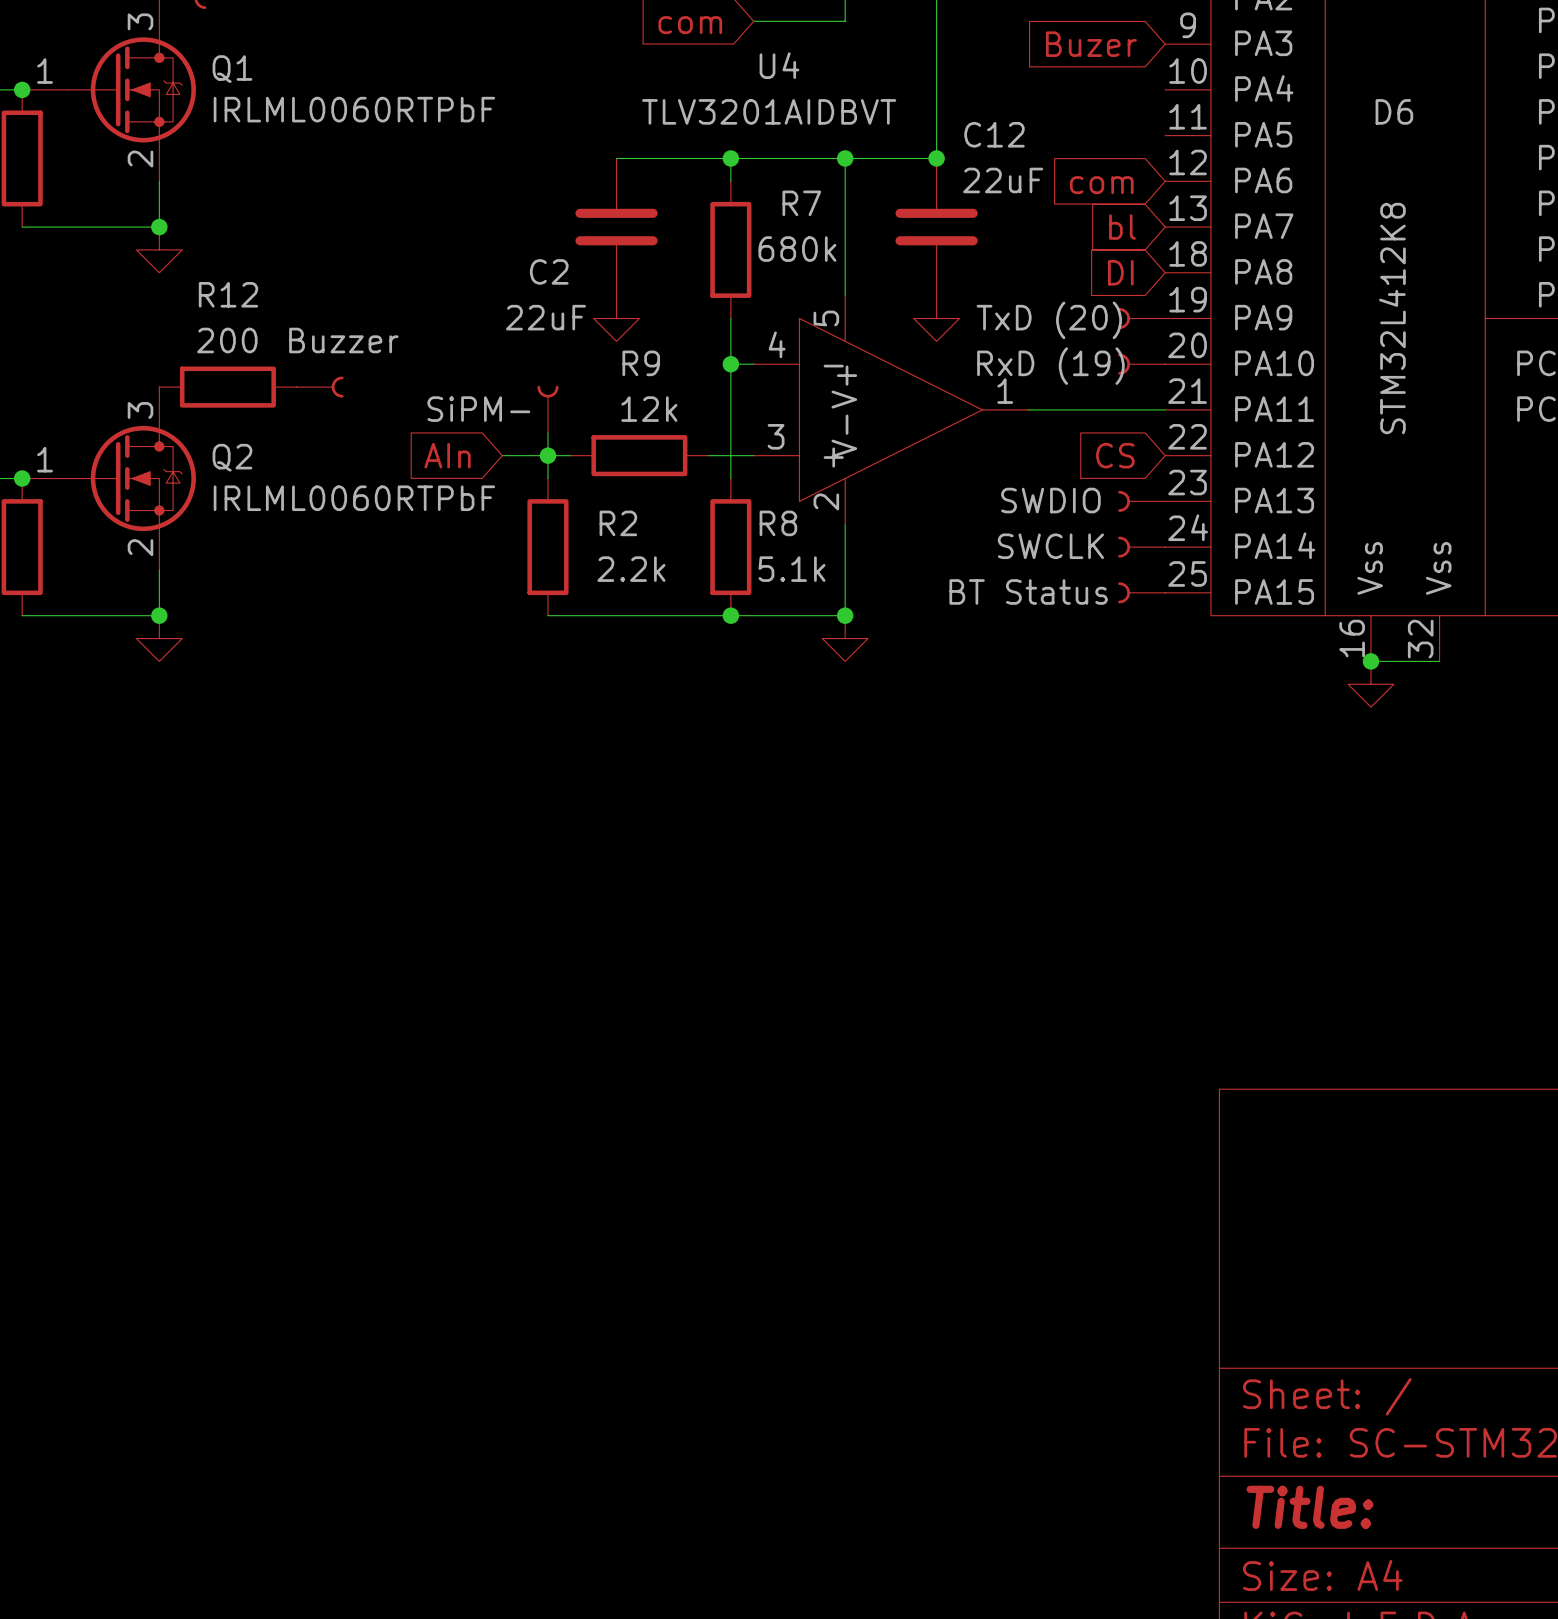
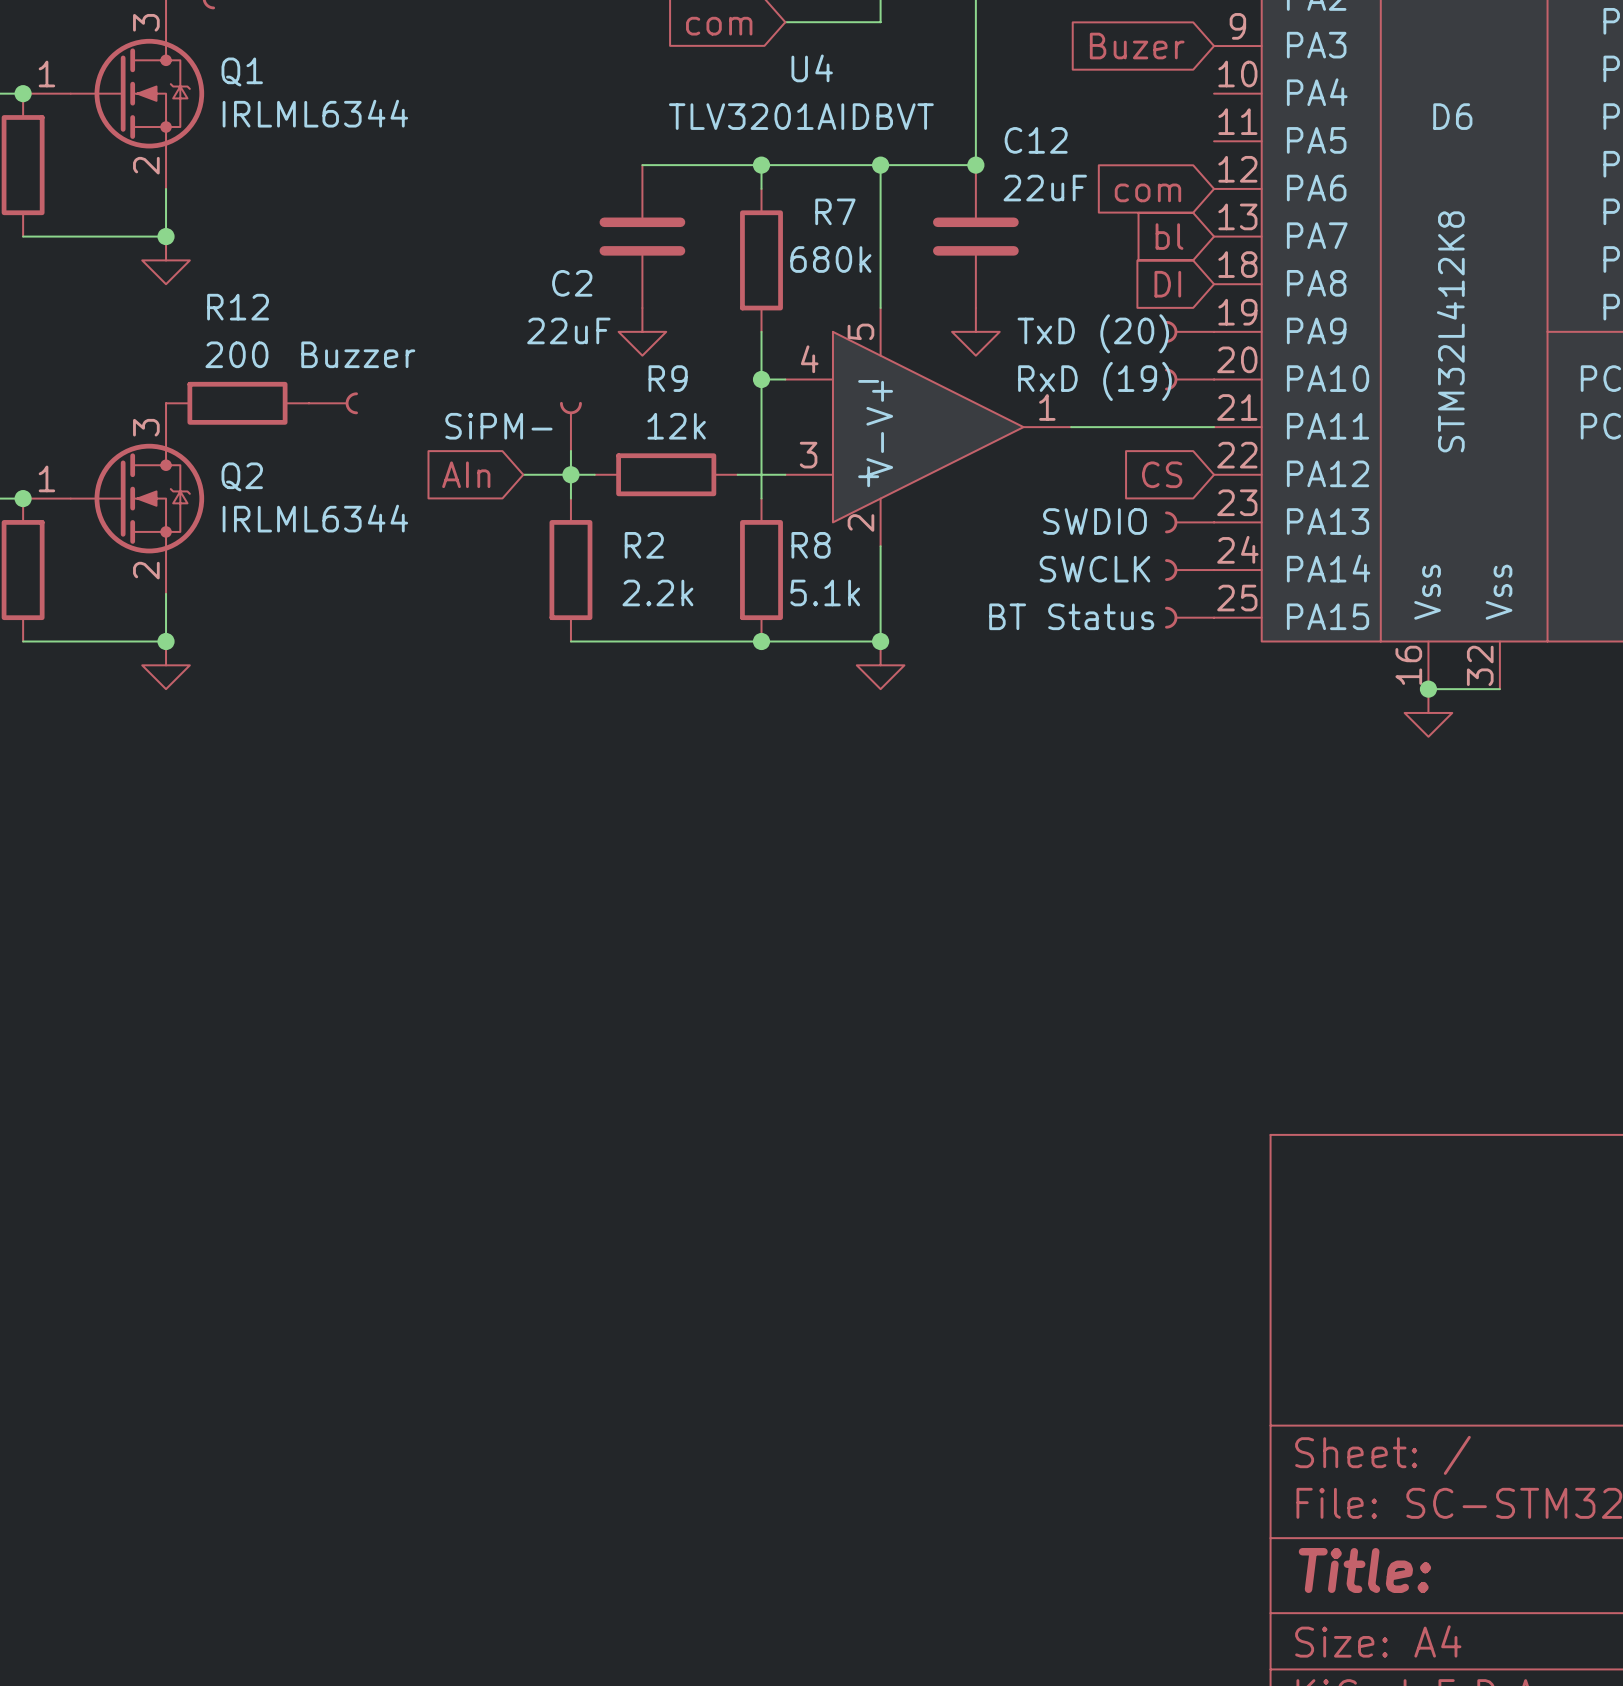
Q1 value: IRLML0060RTPbF (354, 109) -> IRLML6344 (315, 113)
Q2 value: IRLML0060RTPbF (354, 498) -> IRLML6344 (315, 518)

